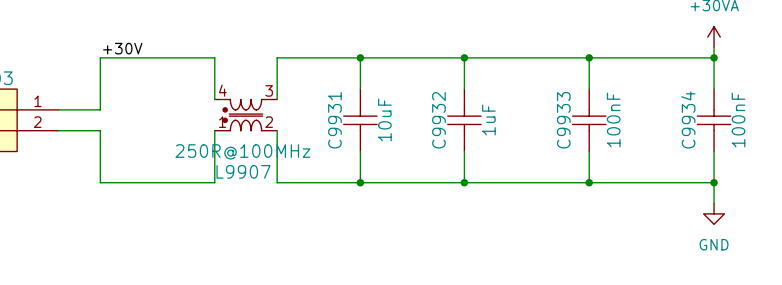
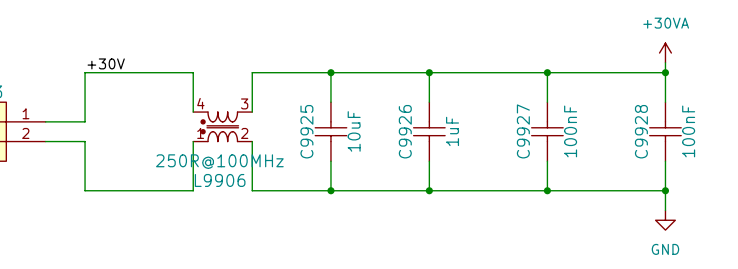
C9931 name: C9931 (334, 120) -> C9925 (306, 131)
C9932 name: C9932 (438, 120) -> C9926 (405, 131)
C9933 name: C9933 (563, 120) -> C9927 (523, 131)
C9934 name: C9934 (688, 120) -> C9928 (641, 131)
L9907 name: L9907 (243, 171) -> L9906 (220, 180)

